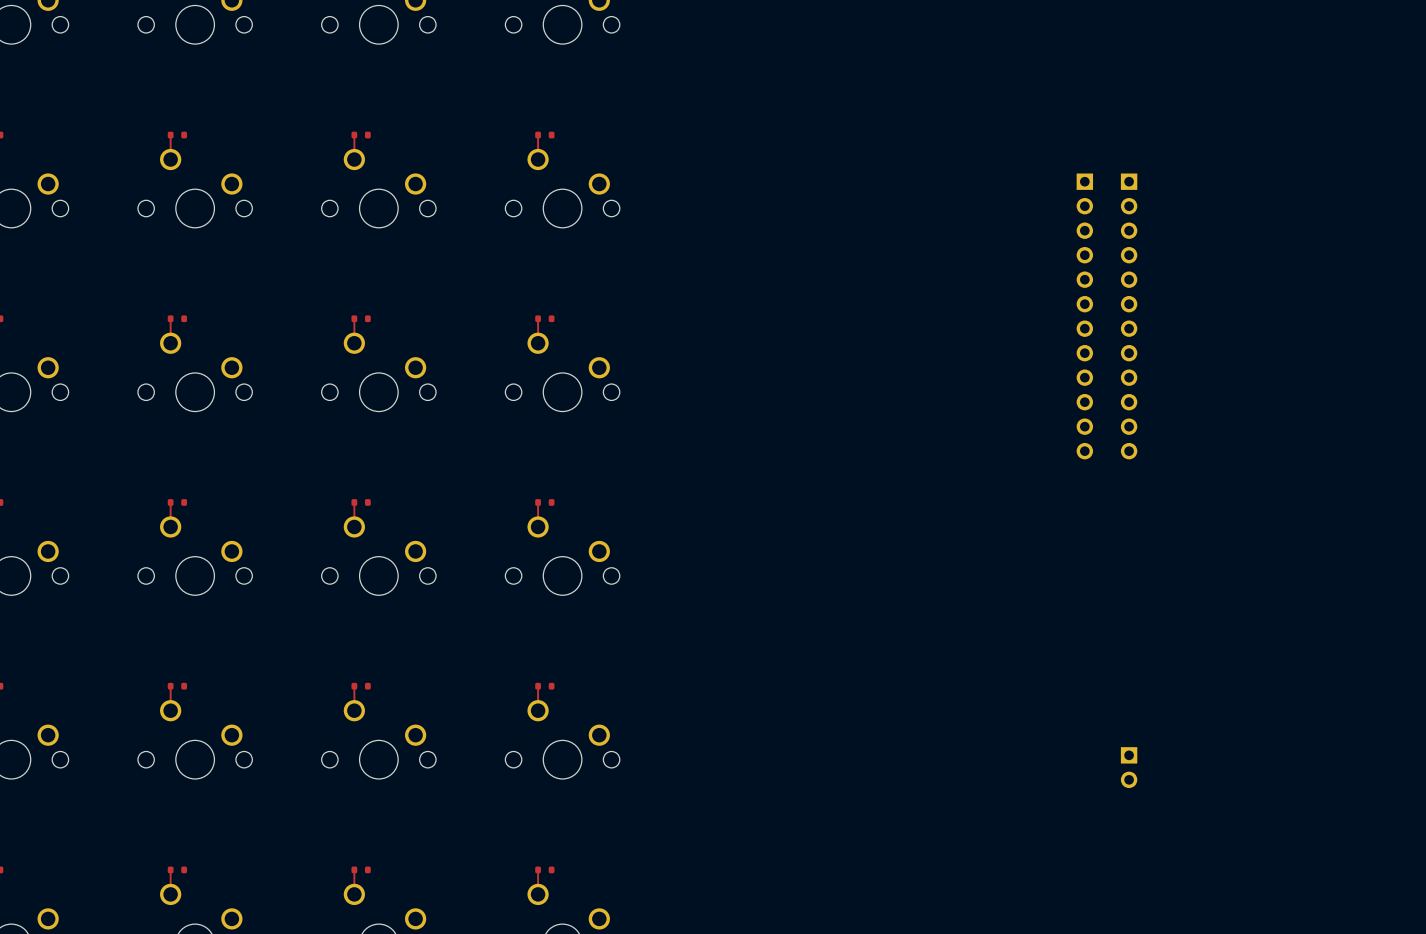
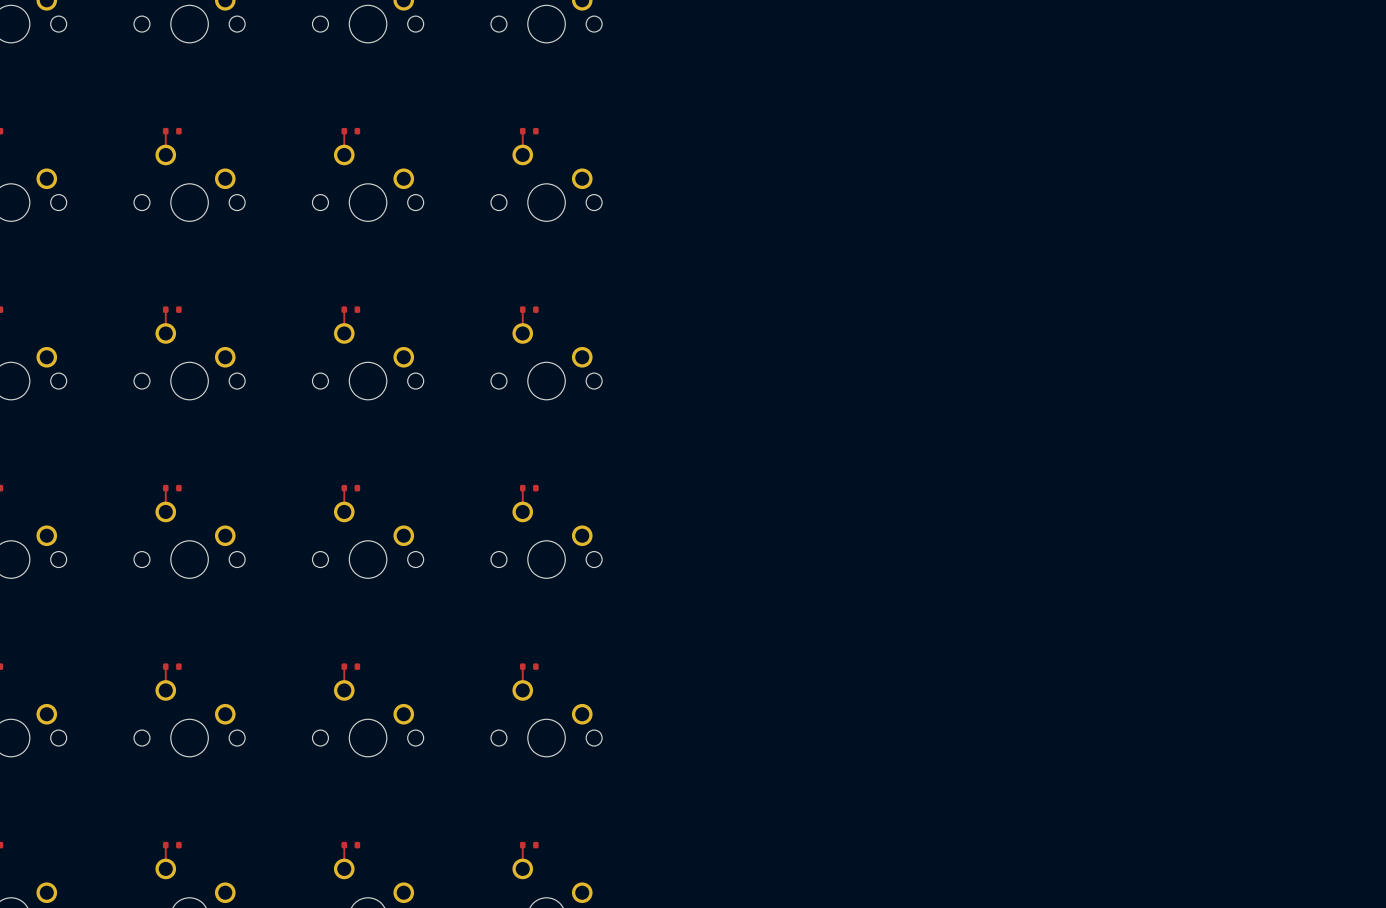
part: (1084, 316) -> none
part: (1129, 316) -> none
part: (1129, 767) -> none

